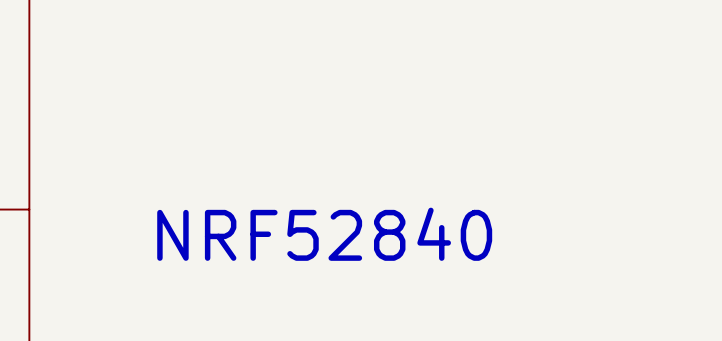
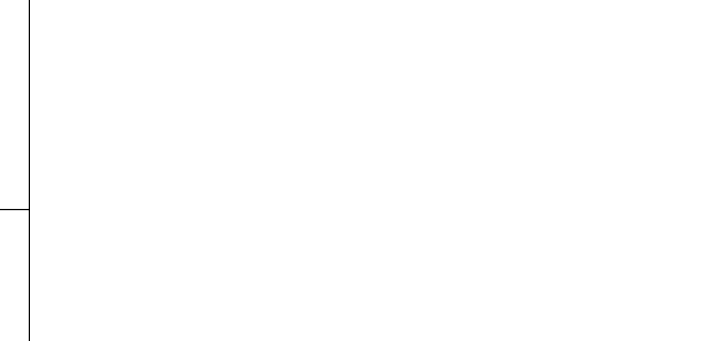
text: NRF52840 (324, 234) -> none

